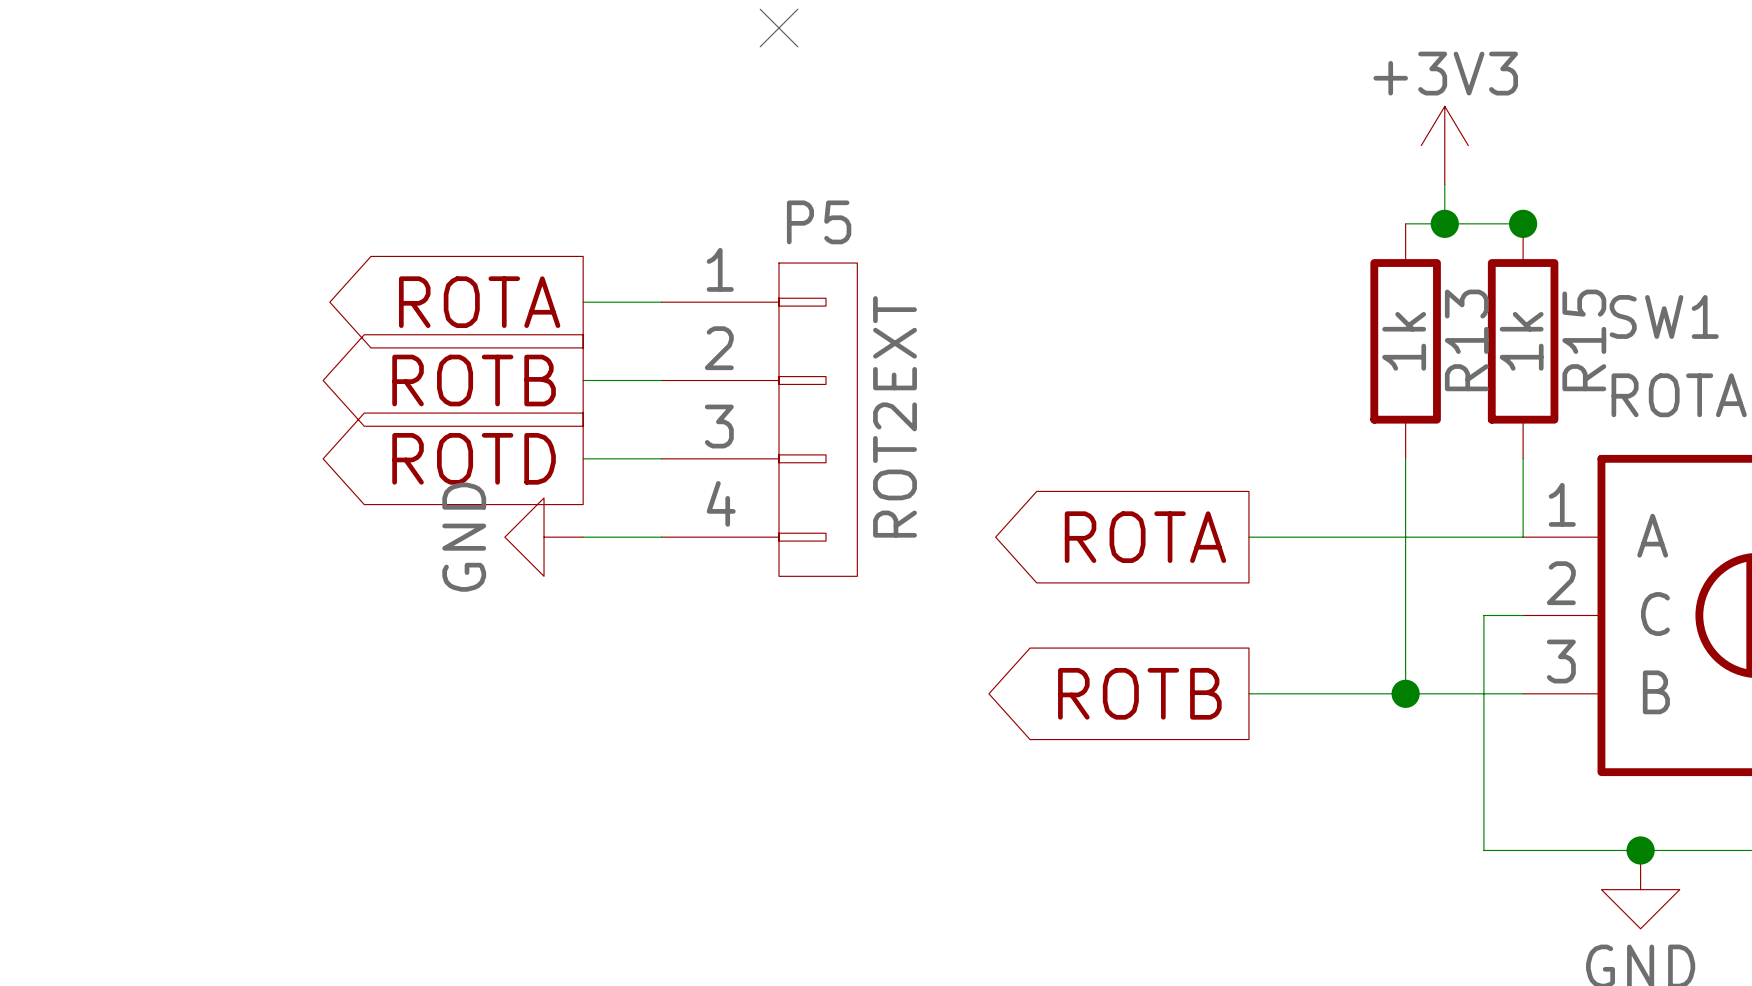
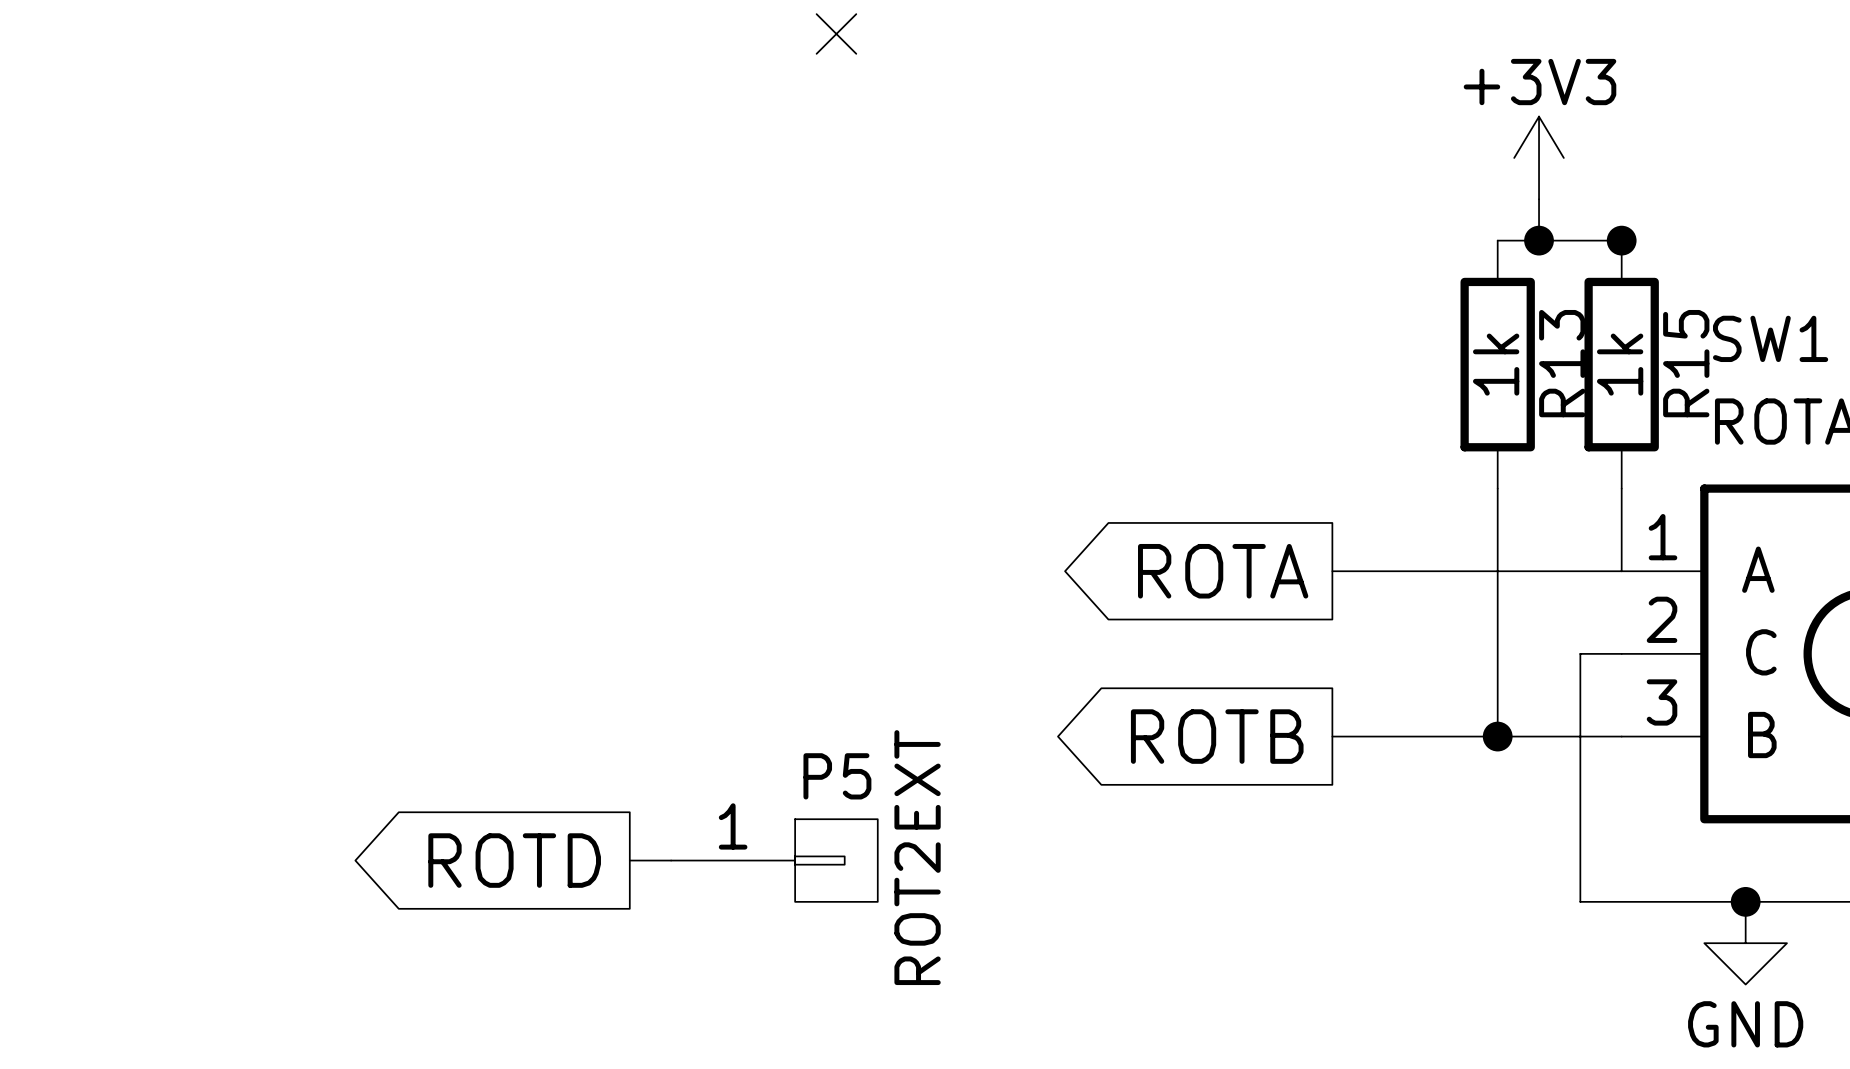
P5 name position: P5 (819, 222) -> P5 (837, 776)
P5 symbol: [661, 263, 858, 577] -> [671, 819, 878, 902]
global label: ROTA (479, 302) -> none
wire: (583, 302) (661, 302) -> none
global label: ROTB (474, 380) -> none
wire: (583, 380) (661, 380) -> none
global label position: ROTD (474, 458) -> ROTD (514, 860)
wire: (583, 458) (661, 458) -> none
power symbol: GND (544, 537) -> none
wire: (583, 537) (661, 537) -> none
wire: none -> (629, 860) (671, 860)

